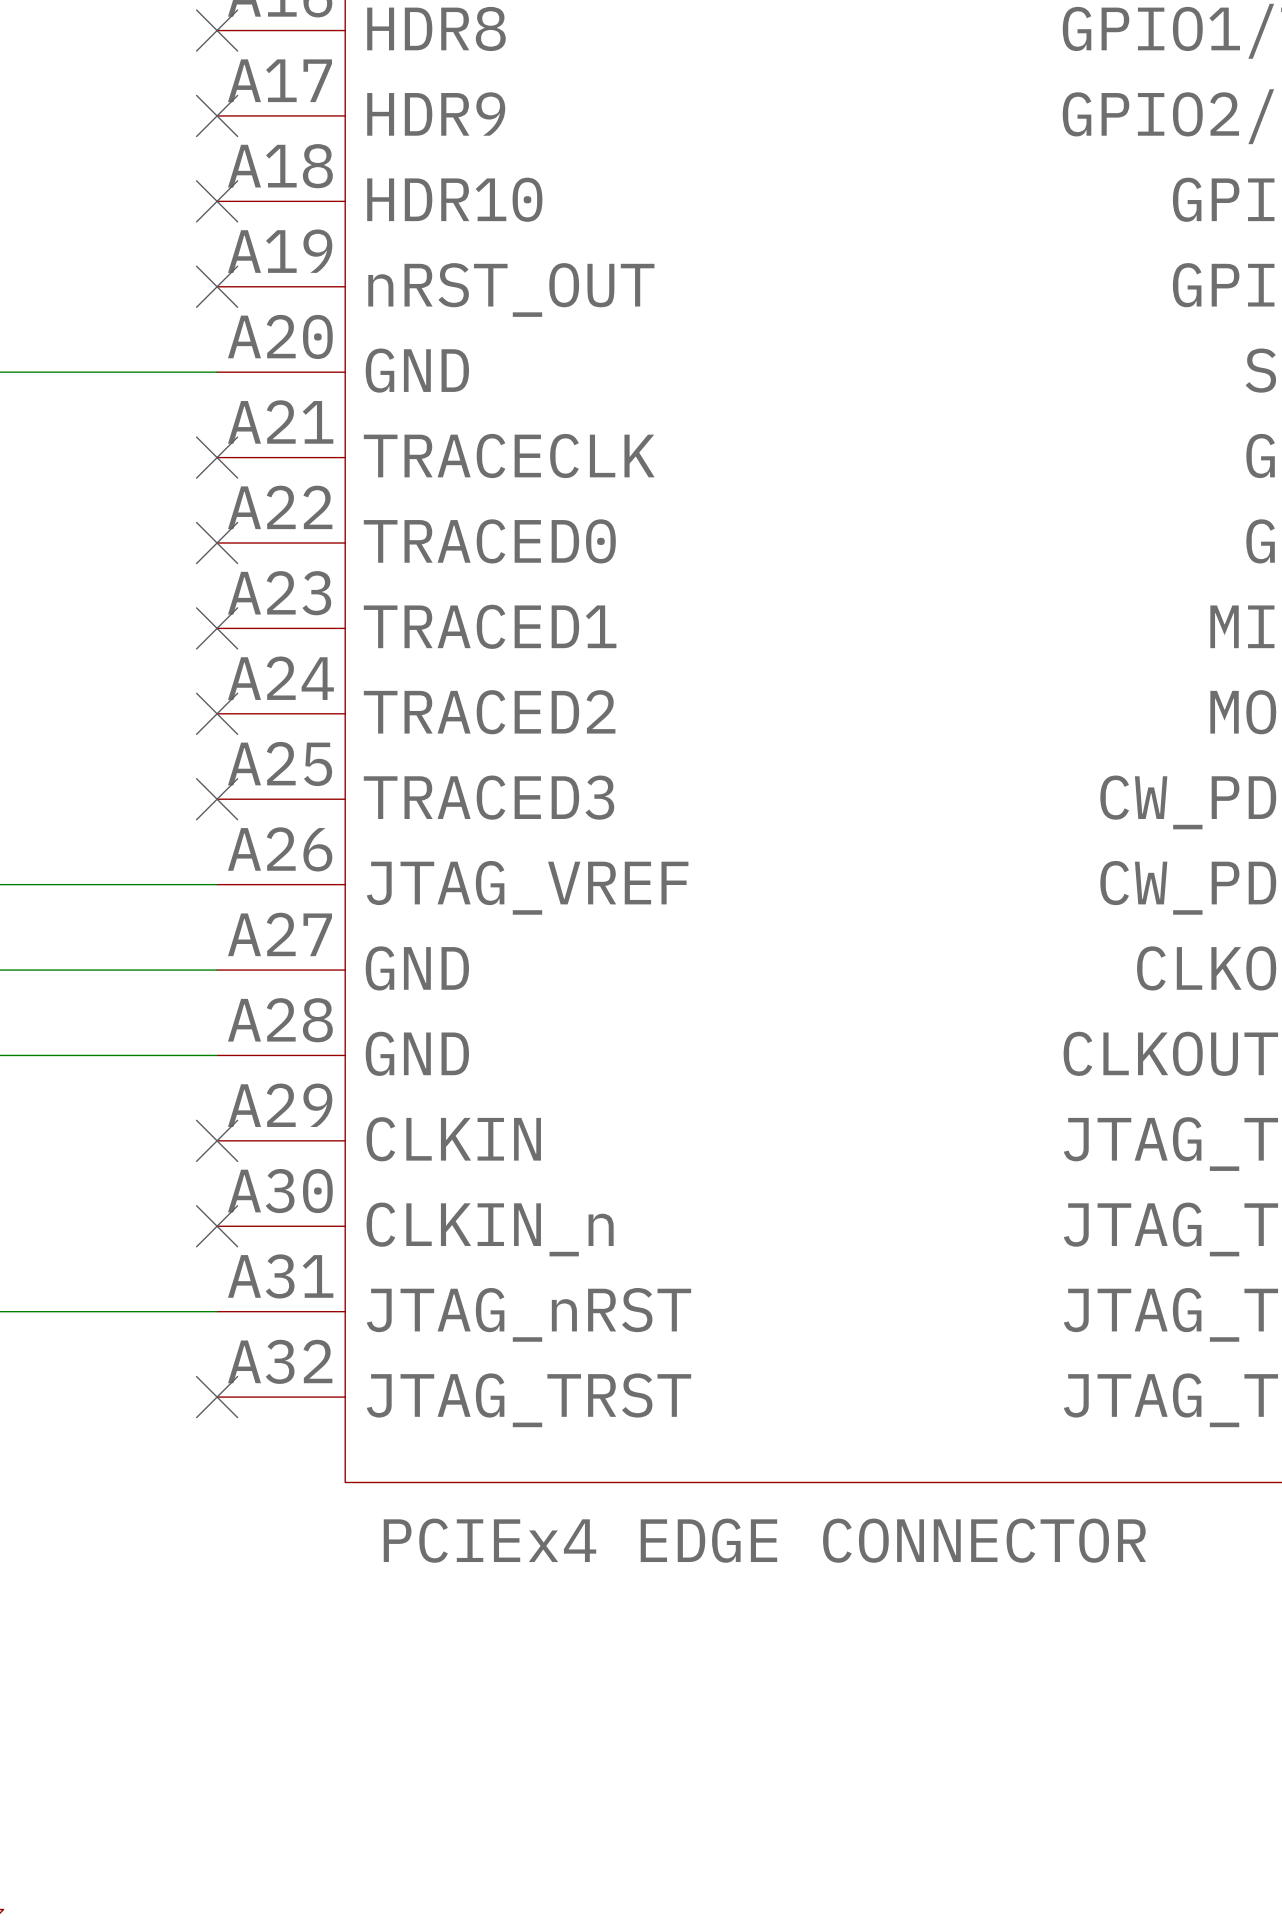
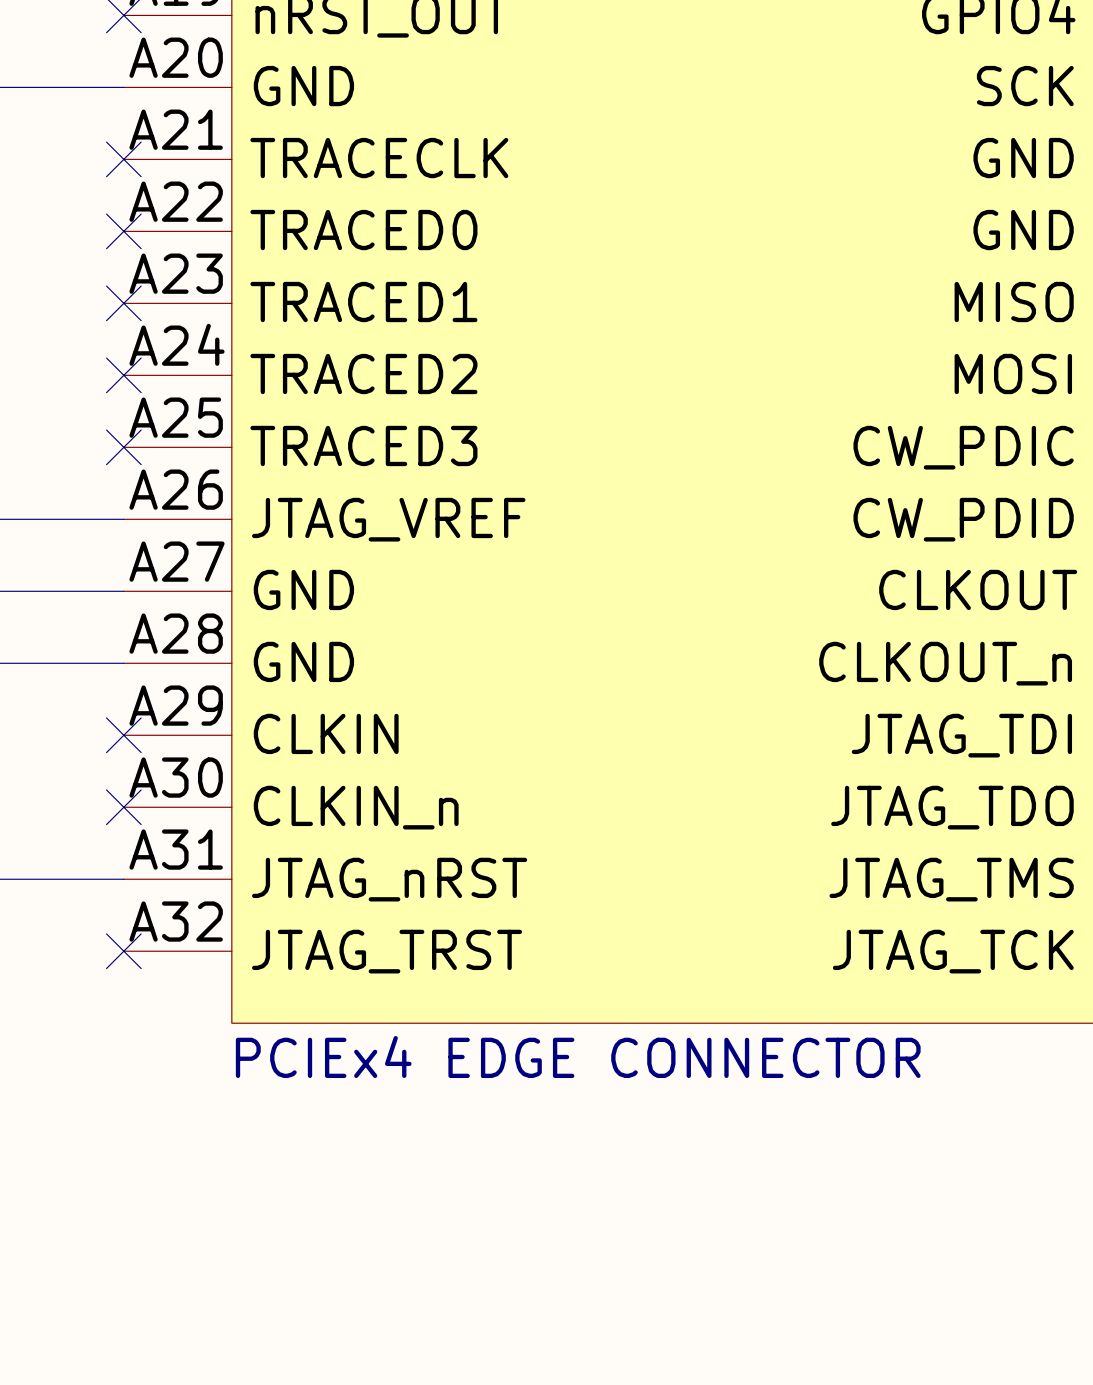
part value position: PCIEx4 EDGE CONNECTOR (764, 1540) -> PCIEx4 EDGE CONNECTOR (578, 1057)

